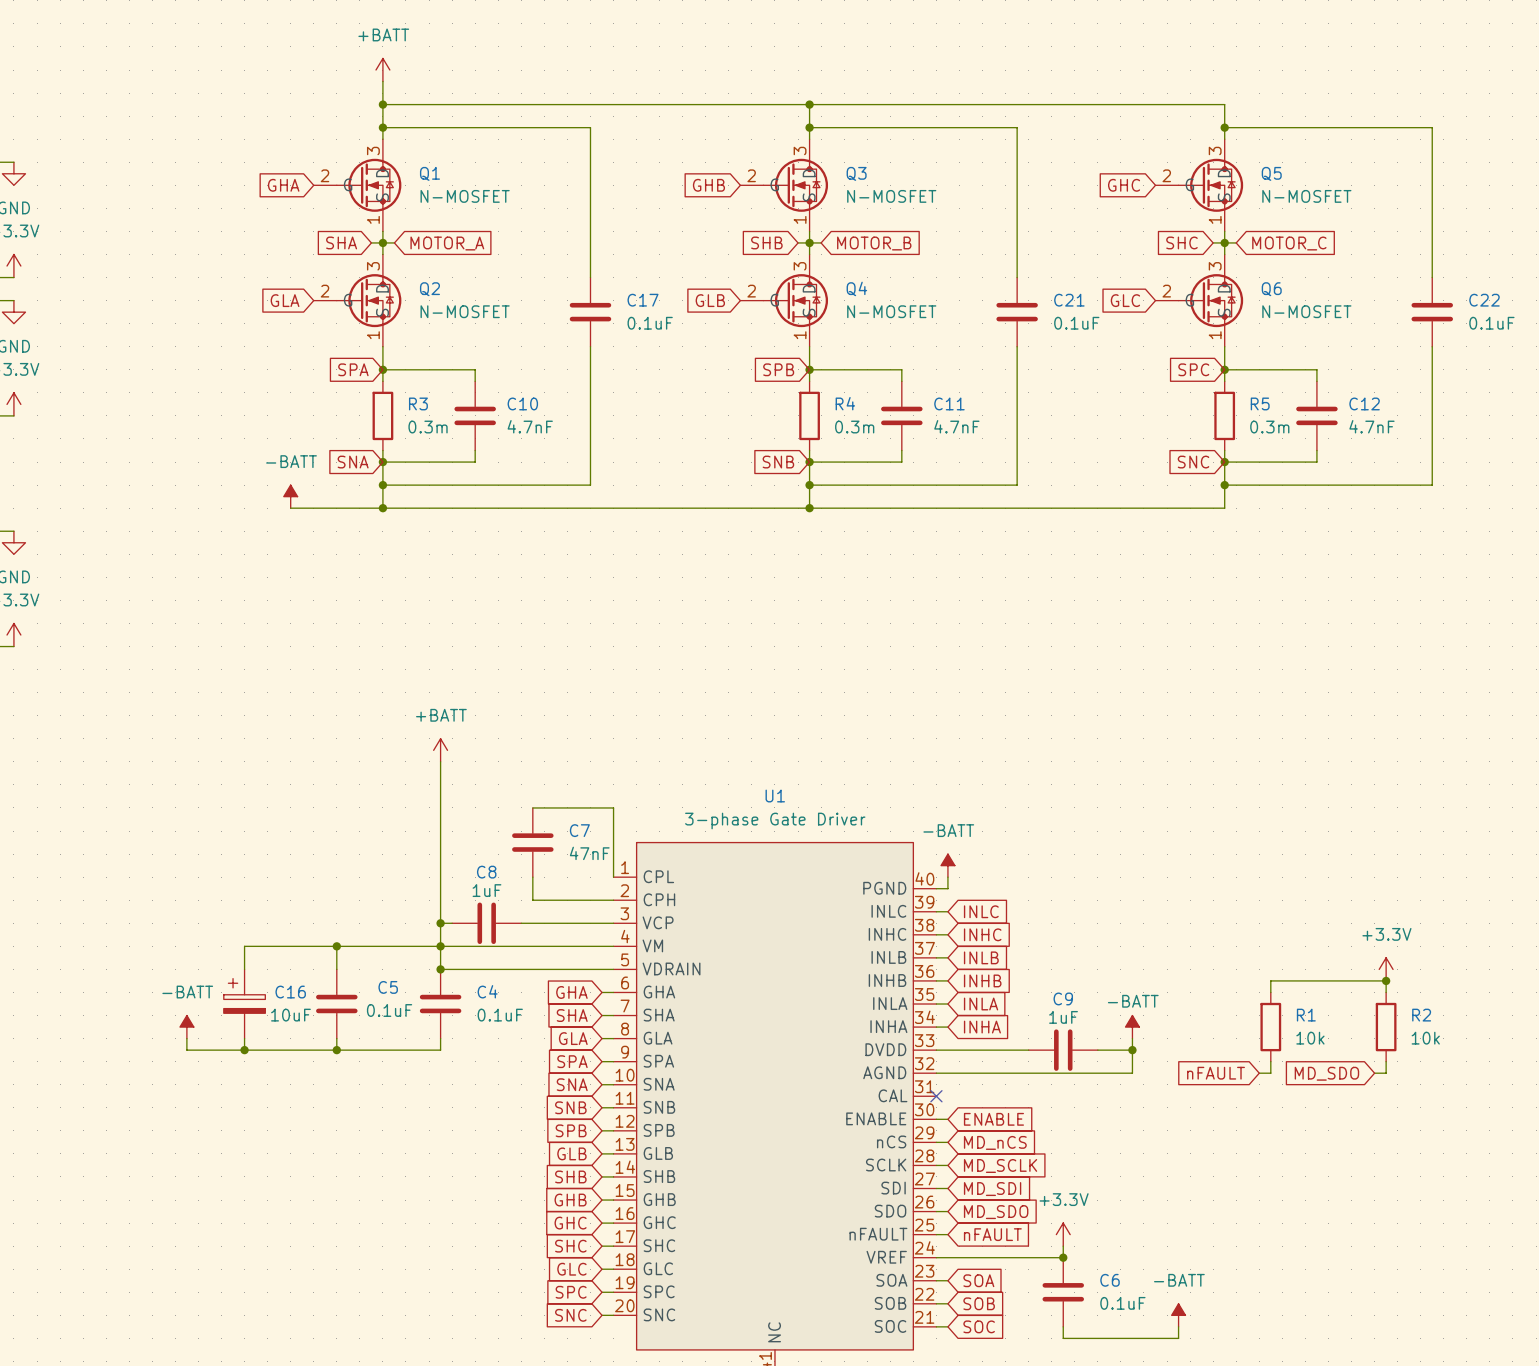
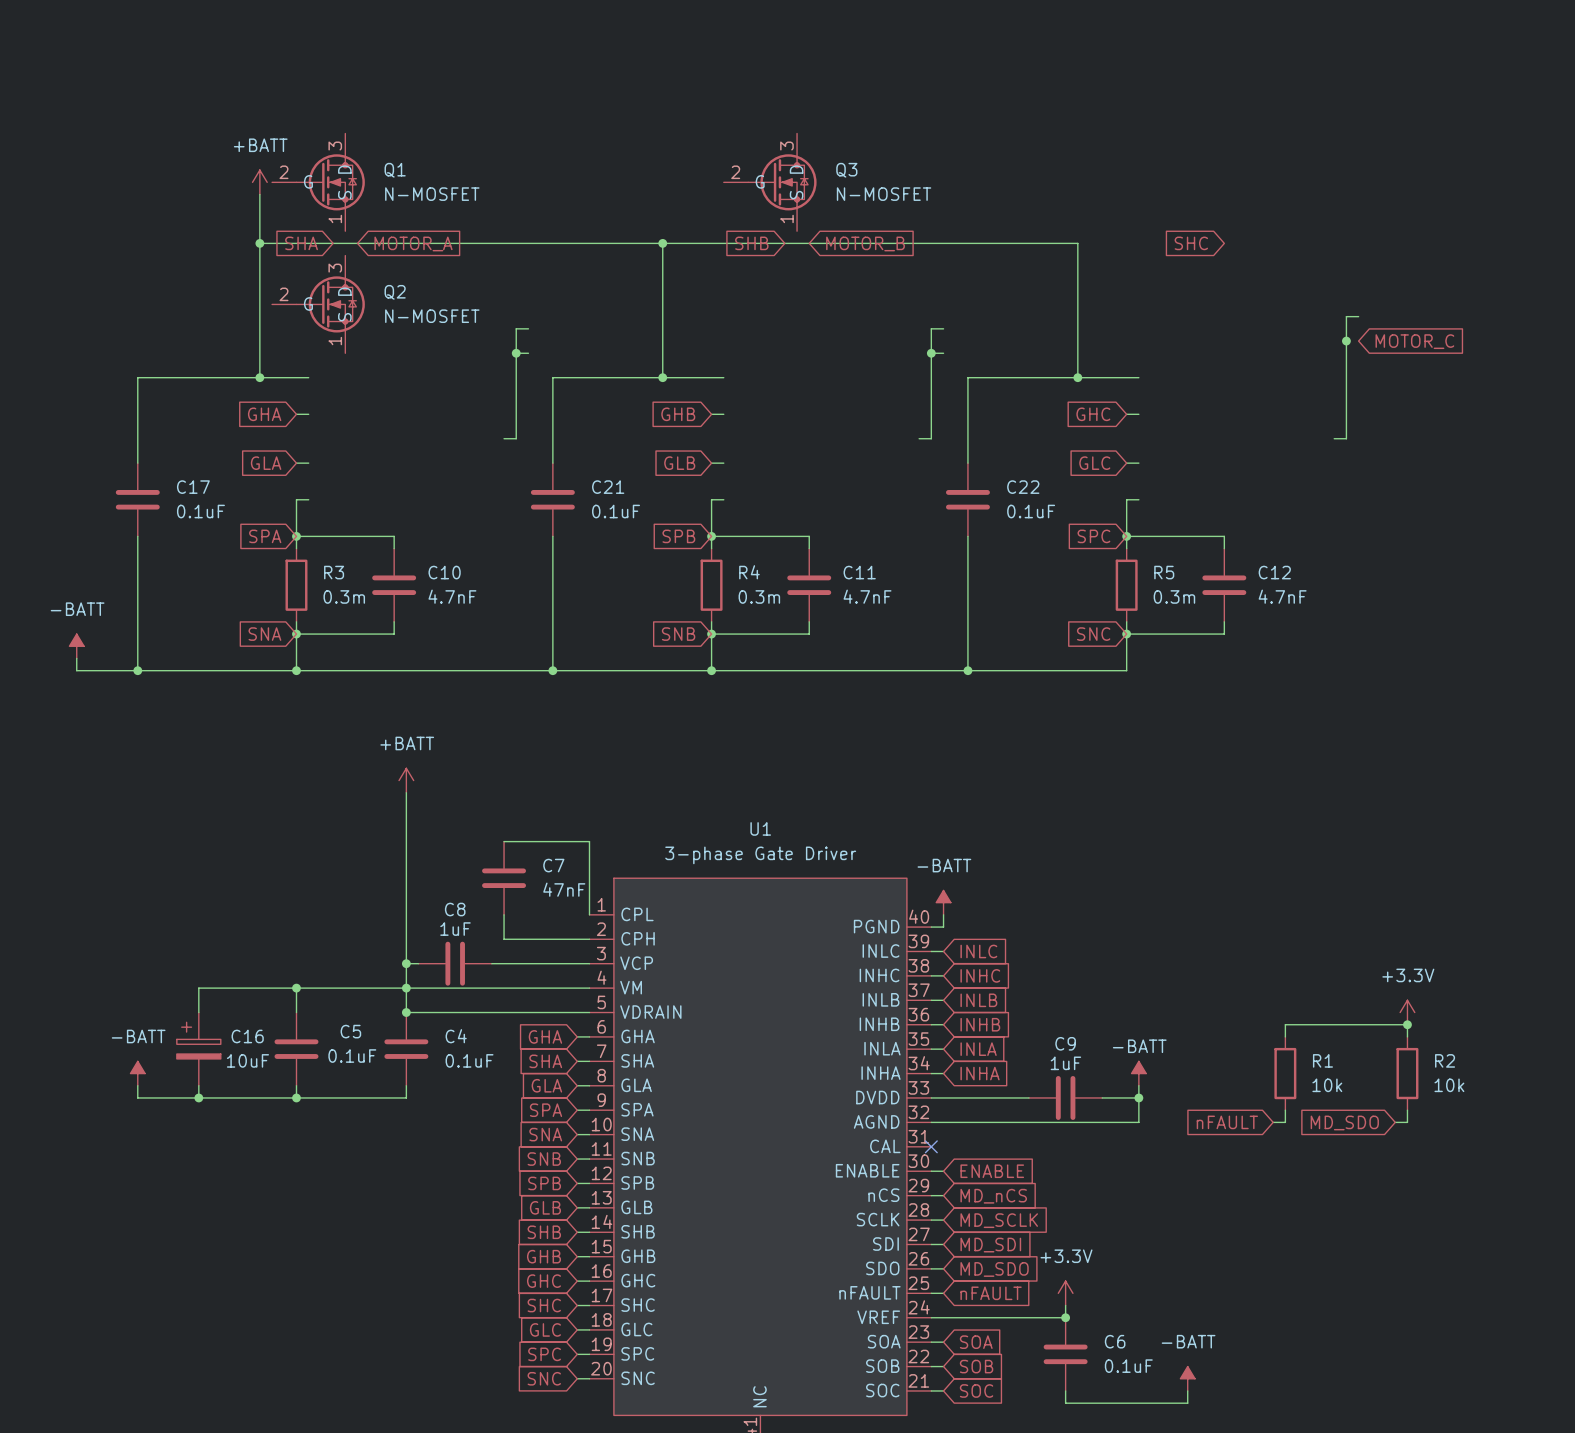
power symbol position: +BATT (382, 70) -> +BATT (259, 182)
wire: (382, 81) (382, 139) -> none
wire: (382, 104) (1224, 104) (1224, 139) -> none
junction: (382, 104) -> none
wire: (809, 104) (809, 139) -> none
junction: (809, 104) -> none
wire: (382, 127) (590, 127) (590, 277) -> none
junction: (382, 127) -> none
wire: (809, 127) (1017, 127) (1017, 277) -> none
junction: (809, 127) -> none
wire: (1224, 127) (1432, 127) (1432, 277) -> none
junction: (1224, 127) -> none
global label position: GHA (283, 185) -> GHA (264, 414)
global label position: GHB (708, 185) -> GHB (678, 414)
global label position: GHC (1124, 185) -> GHC (1093, 414)
Q5: N-MOSFET (1199, 185) -> none
wire: none -> (259, 194) (259, 377)
wire: (382, 231) (382, 254) -> none
wire: (809, 231) (809, 254) -> none
wire: (1224, 231) (1224, 254) -> none
wire: none -> (259, 243) (333, 243)
junction: none -> (259, 243)
junction: (382, 242) -> none
wire: none -> (357, 243) (784, 243)
wire: none -> (662, 243) (662, 377)
junction: none -> (662, 243)
junction: (809, 242) -> none
wire: none -> (809, 243) (1077, 243) (1077, 377)
wire: (1213, 242) (1236, 242) -> none
junction: (1224, 242) -> none
global label position: MOTOR_C (1289, 243) -> MOTOR_C (1414, 341)
global label position: GLA (285, 300) -> GLA (266, 463)
global label position: GLB (710, 300) -> GLB (679, 463)
Q4: N-MOSFET (784, 300) -> none
global label position: GLC (1125, 300) -> GLC (1094, 463)
Q6: N-MOSFET (1199, 300) -> none
C17 position: (590, 312) -> (137, 499)
C21 position: (1017, 312) -> (552, 499)
wire: none -> (1358, 316) (1346, 316) (1346, 438) (1334, 438)
C22 position: (1432, 312) -> (967, 499)
wire: none -> (528, 328) (516, 328) (516, 438) (504, 438)
wire: none -> (943, 328) (931, 328) (931, 438) (919, 438)
junction: none -> (1346, 341)
wire: (382, 346) (382, 381) -> none
wire: none -> (516, 353) (528, 353)
junction: none -> (516, 353)
wire: (590, 346) (590, 485) (382, 485) -> none
wire: (809, 346) (809, 381) -> none
wire: none -> (931, 353) (943, 353)
junction: none -> (931, 353)
wire: (1017, 346) (1017, 485) (809, 485) -> none
wire: (1224, 346) (1224, 381) -> none
wire: (1432, 346) (1432, 485) (1224, 485) -> none
junction: none -> (259, 377)
wire: none -> (308, 377) (137, 377) (137, 463)
global label position: SPA (353, 369) -> SPA (265, 536)
wire: (382, 369) (475, 369) (475, 381) -> (296, 536) (394, 536) (394, 548)
junction: (382, 369) -> none
junction: none -> (662, 377)
wire: none -> (723, 377) (552, 377) (552, 463)
global label position: SPB (778, 369) -> SPB (678, 536)
wire: (809, 369) (901, 369) (901, 381) -> (711, 536) (809, 536) (809, 548)
junction: (809, 369) -> none
junction: none -> (1077, 377)
wire: none -> (1138, 377) (967, 377) (967, 463)
global label position: SPC (1193, 369) -> SPC (1093, 536)
wire: (1224, 369) (1316, 369) (1316, 381) -> (1126, 536) (1224, 536) (1224, 548)
junction: (1224, 369) -> none
wire: none -> (296, 414) (308, 414)
wire: none -> (711, 414) (723, 414)
wire: none -> (1126, 414) (1138, 414)
R3 position: (382, 415) -> (296, 585)
C10 position: (475, 415) -> (394, 585)
R4 position: (809, 415) -> (711, 585)
C11 position: (901, 415) -> (809, 585)
R5 position: (1224, 415) -> (1126, 585)
C12 position: (1316, 415) -> (1224, 585)
wire: (382, 450) (382, 508) -> none
wire: (475, 450) (475, 462) (382, 462) -> (394, 621) (394, 634) (296, 634)
wire: none -> (711, 463) (723, 463)
wire: (809, 450) (809, 508) -> none
wire: (901, 450) (901, 462) (809, 462) -> (809, 621) (809, 634) (711, 634)
wire: none -> (1126, 463) (1138, 463)
wire: (1224, 450) (1224, 508) (290, 508) -> none
wire: (1316, 450) (1316, 462) (1224, 462) -> (1224, 621) (1224, 634) (1126, 634)
global label position: SNA (353, 462) -> SNA (264, 634)
junction: (382, 462) -> none
global label position: SNB (778, 462) -> SNB (678, 634)
junction: (809, 462) -> none
global label position: SNC (1193, 462) -> SNC (1093, 634)
junction: (1224, 462) -> none
wire: none -> (308, 499) (296, 499) (296, 548)
junction: (382, 485) -> none
wire: none -> (723, 499) (711, 499) (711, 548)
junction: (809, 485) -> none
wire: none -> (1138, 499) (1126, 499) (1126, 548)
junction: (1224, 485) -> none
power symbol position: -BATT (290, 496) -> -BATT (76, 646)
junction: (382, 508) -> none
junction: (809, 508) -> none
wire: none -> (137, 536) (137, 670)
junction: none -> (296, 536)
wire: none -> (552, 536) (552, 670)
junction: none -> (711, 536)
wire: none -> (967, 536) (967, 670)
junction: none -> (1126, 536)
wire: none -> (296, 621) (296, 670)
wire: none -> (711, 621) (711, 670)
wire: none -> (1126, 621) (1126, 670) (76, 670) (76, 658)
junction: none -> (296, 634)
junction: none -> (711, 634)
junction: none -> (1126, 634)
junction: none -> (137, 670)
junction: none -> (296, 670)
junction: none -> (552, 670)
junction: none -> (711, 670)
junction: none -> (967, 670)

